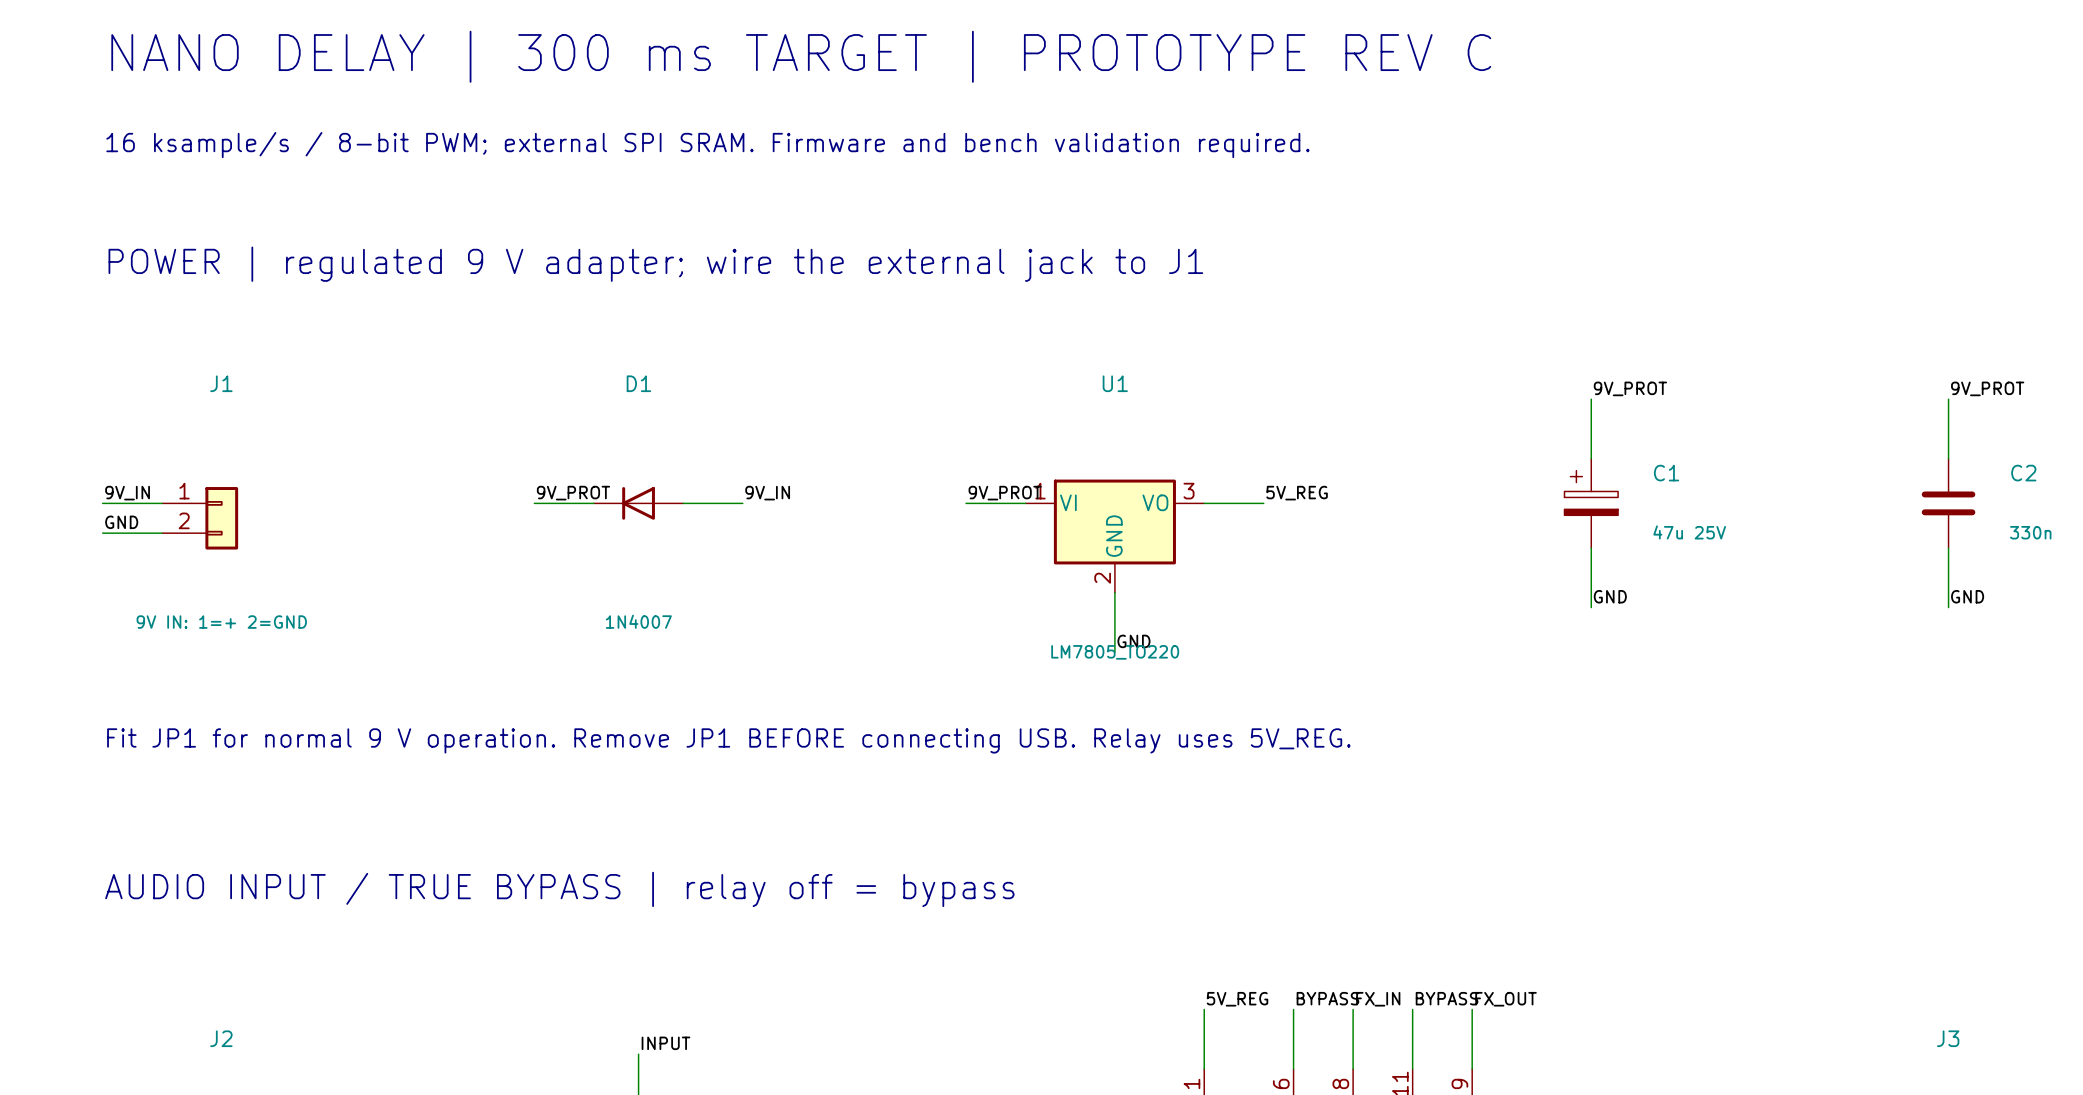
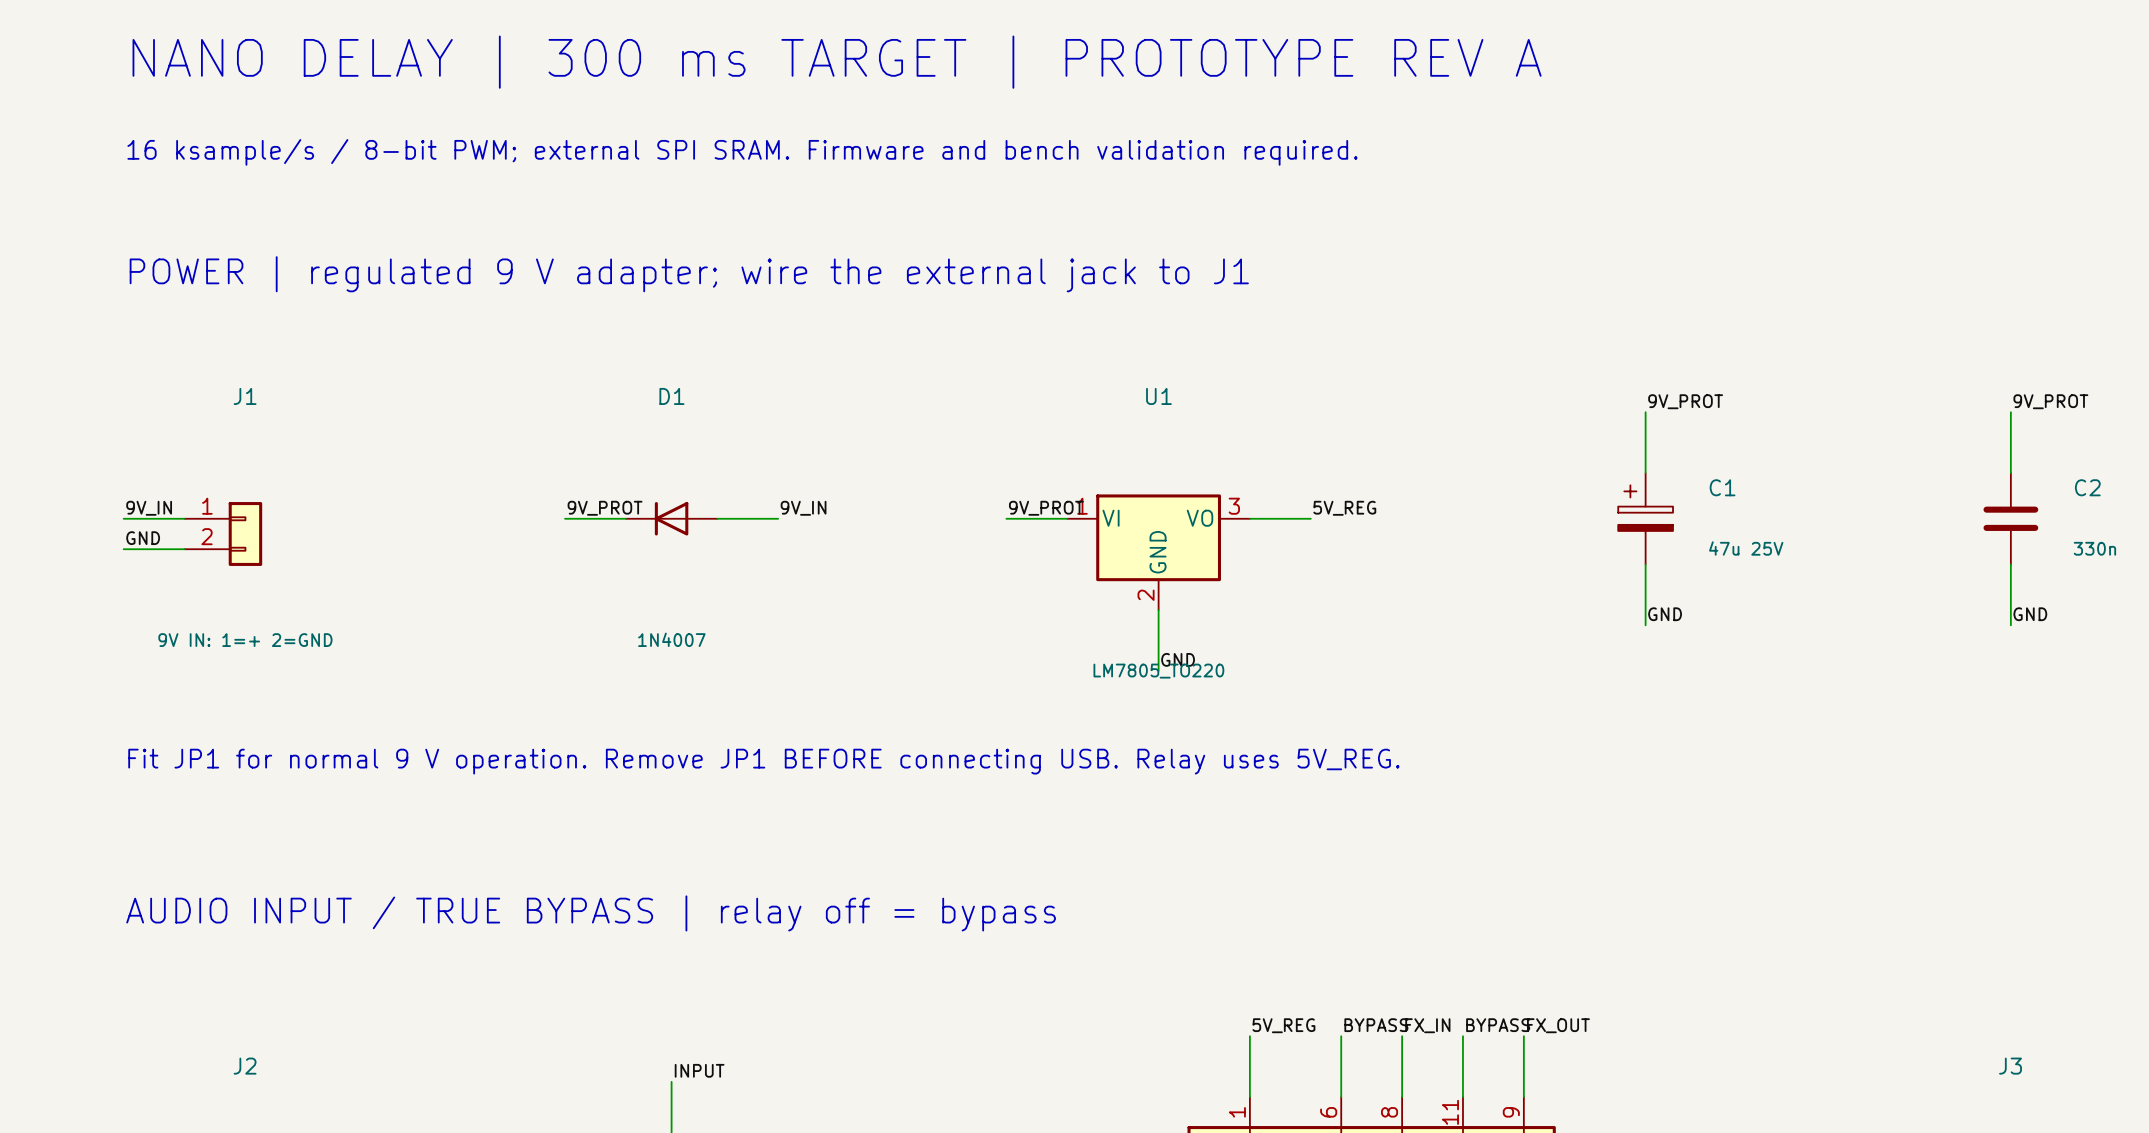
text: NANO DELAY | 300 ms TARGET | PROTOTYPE REV C (801, 56) -> NANO DELAY | 300 ms TARGET | PROTOTYPE REV A (837, 62)

